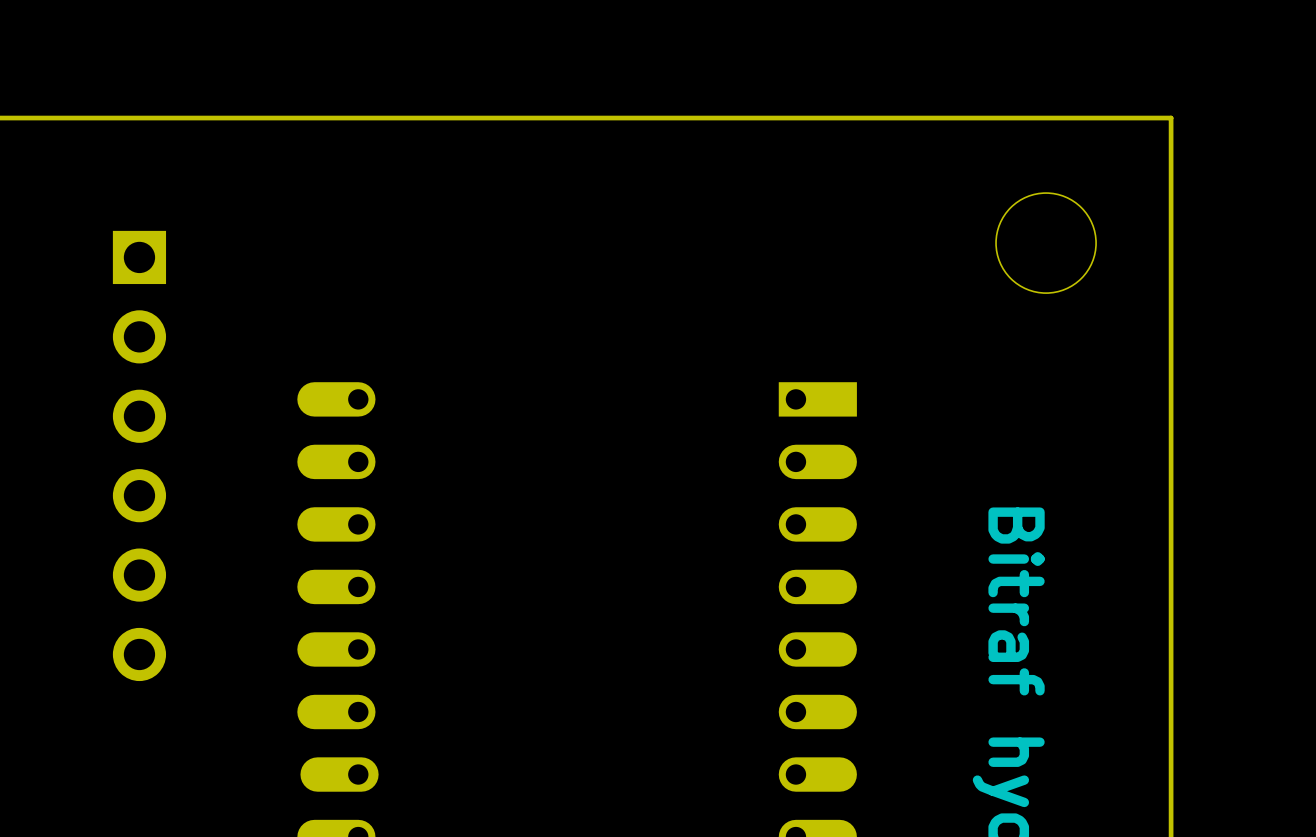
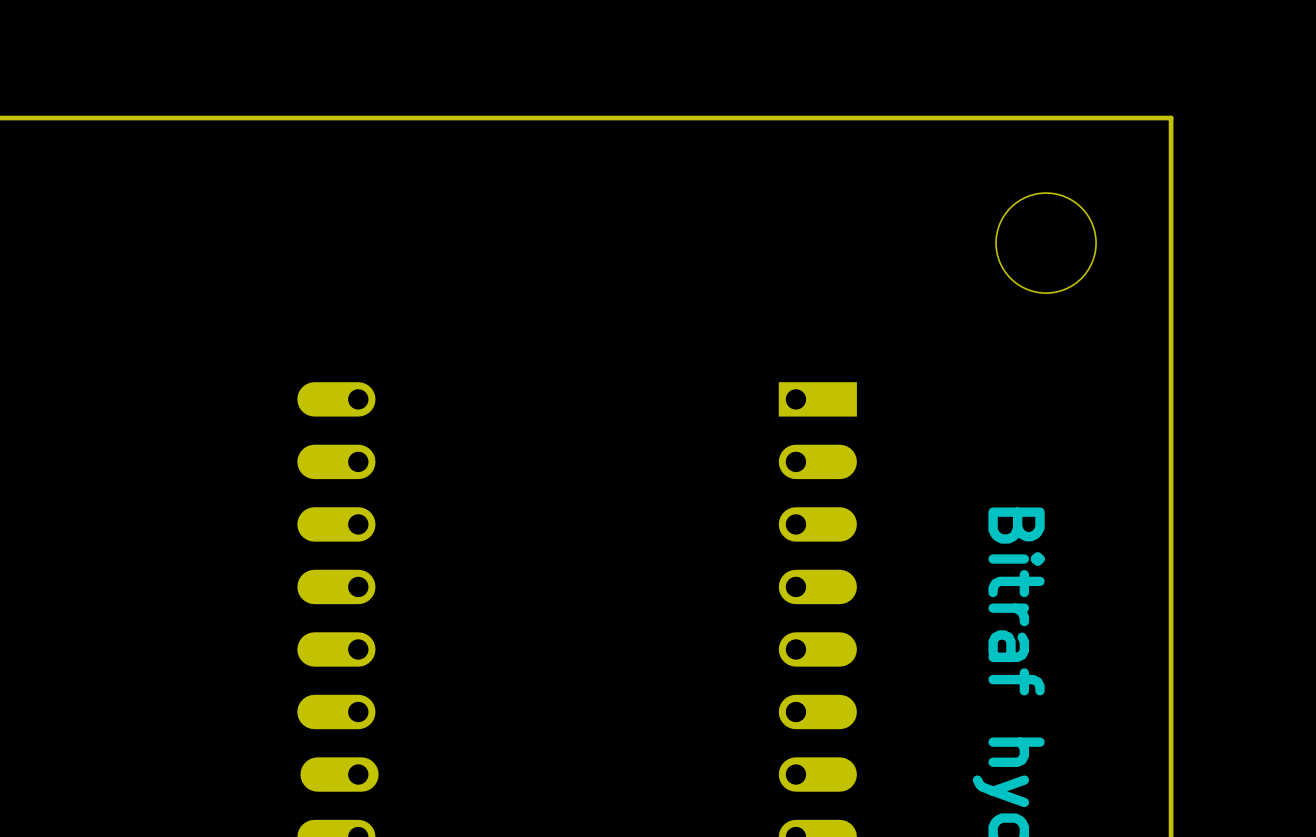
part: (139, 455) -> none

